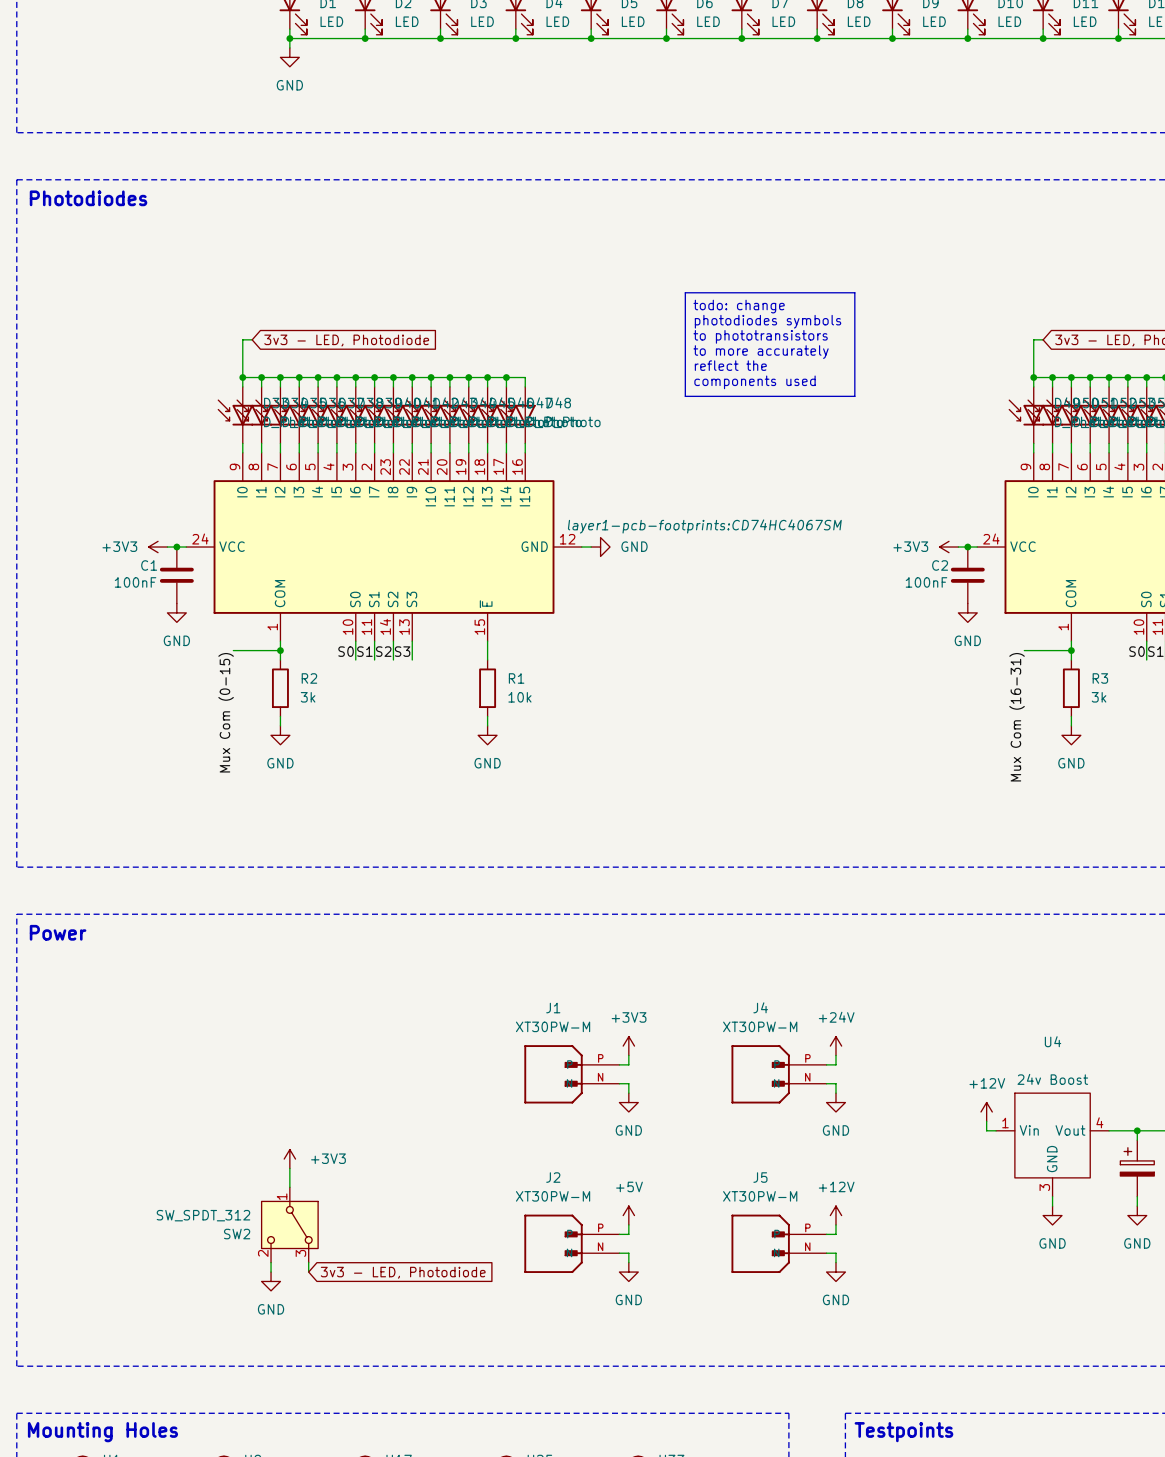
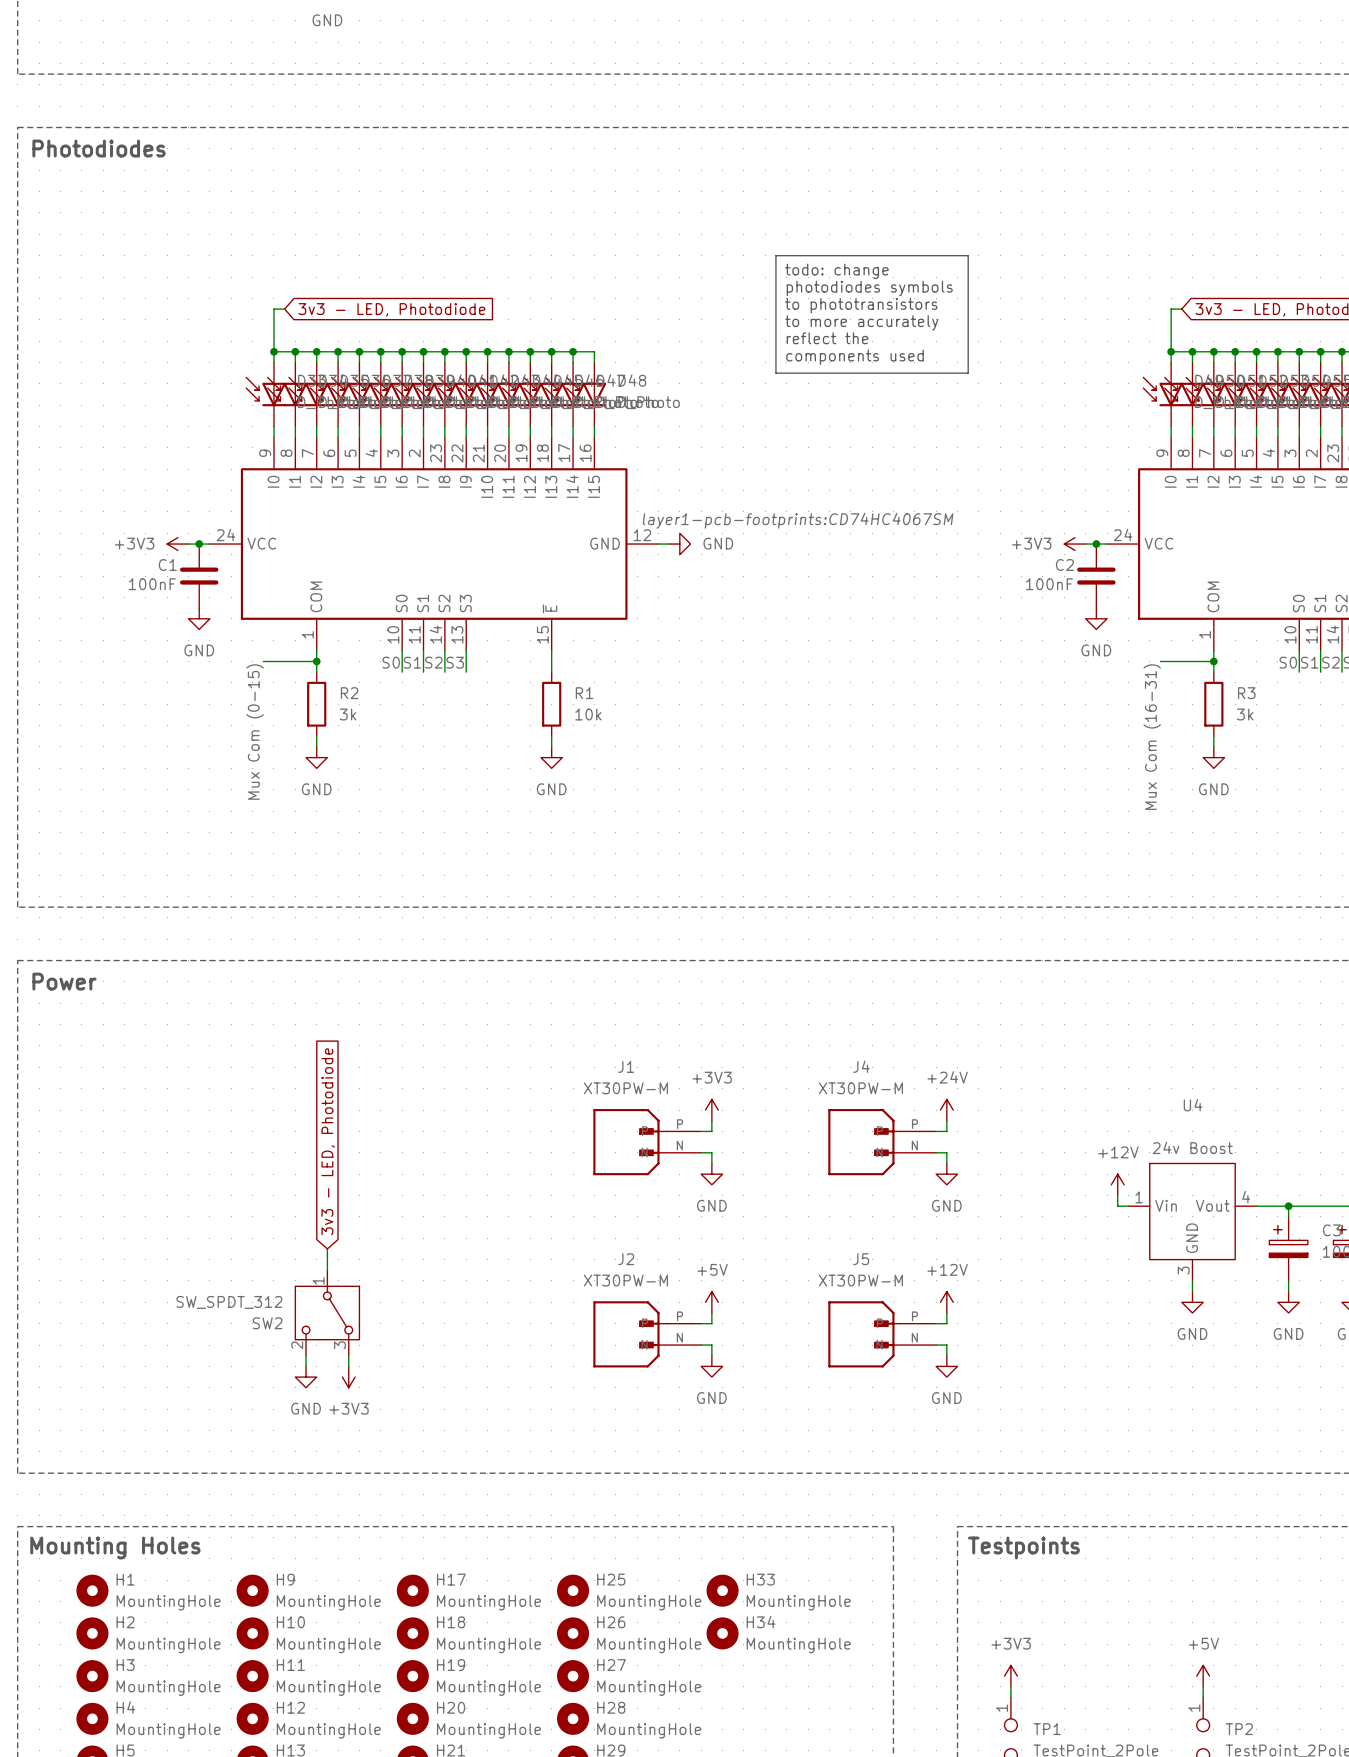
power symbol text position: +3V3 (328, 1158) -> +3V3 (349, 1408)
power symbol rotation: 0° (289, 1159) -> 180° (348, 1377)
power symbol position: +3V3 (289, 1159) -> +3V3 (348, 1377)
global label rotation: 0° (403, 1272) -> 90° counterclockwise (328, 1141)
global label position: 3v3 - LED, Photodiode (403, 1272) -> 3v3 - LED, Photodiode (328, 1141)

